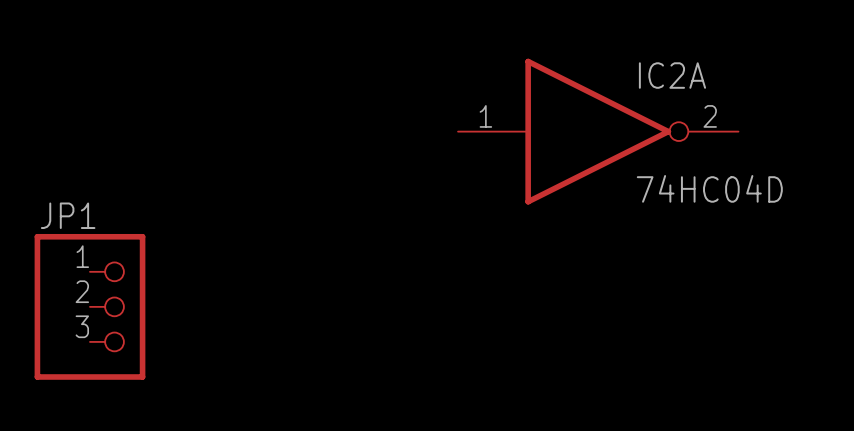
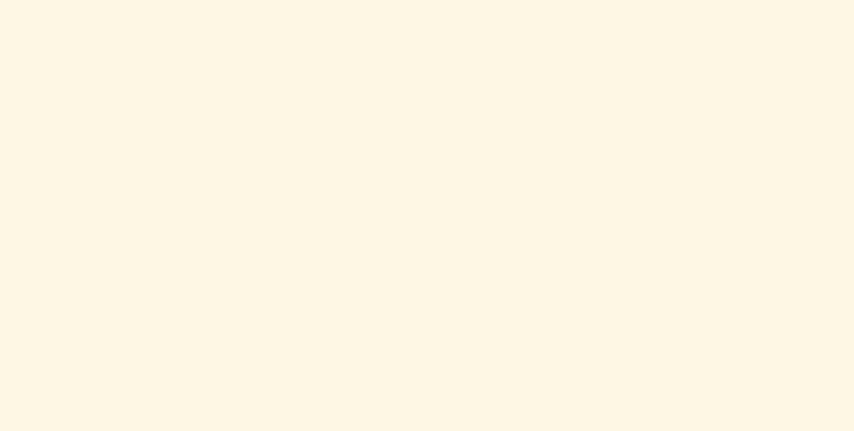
IC2A: 74HC04D (598, 131) -> none
JP1: (89, 306) -> none

